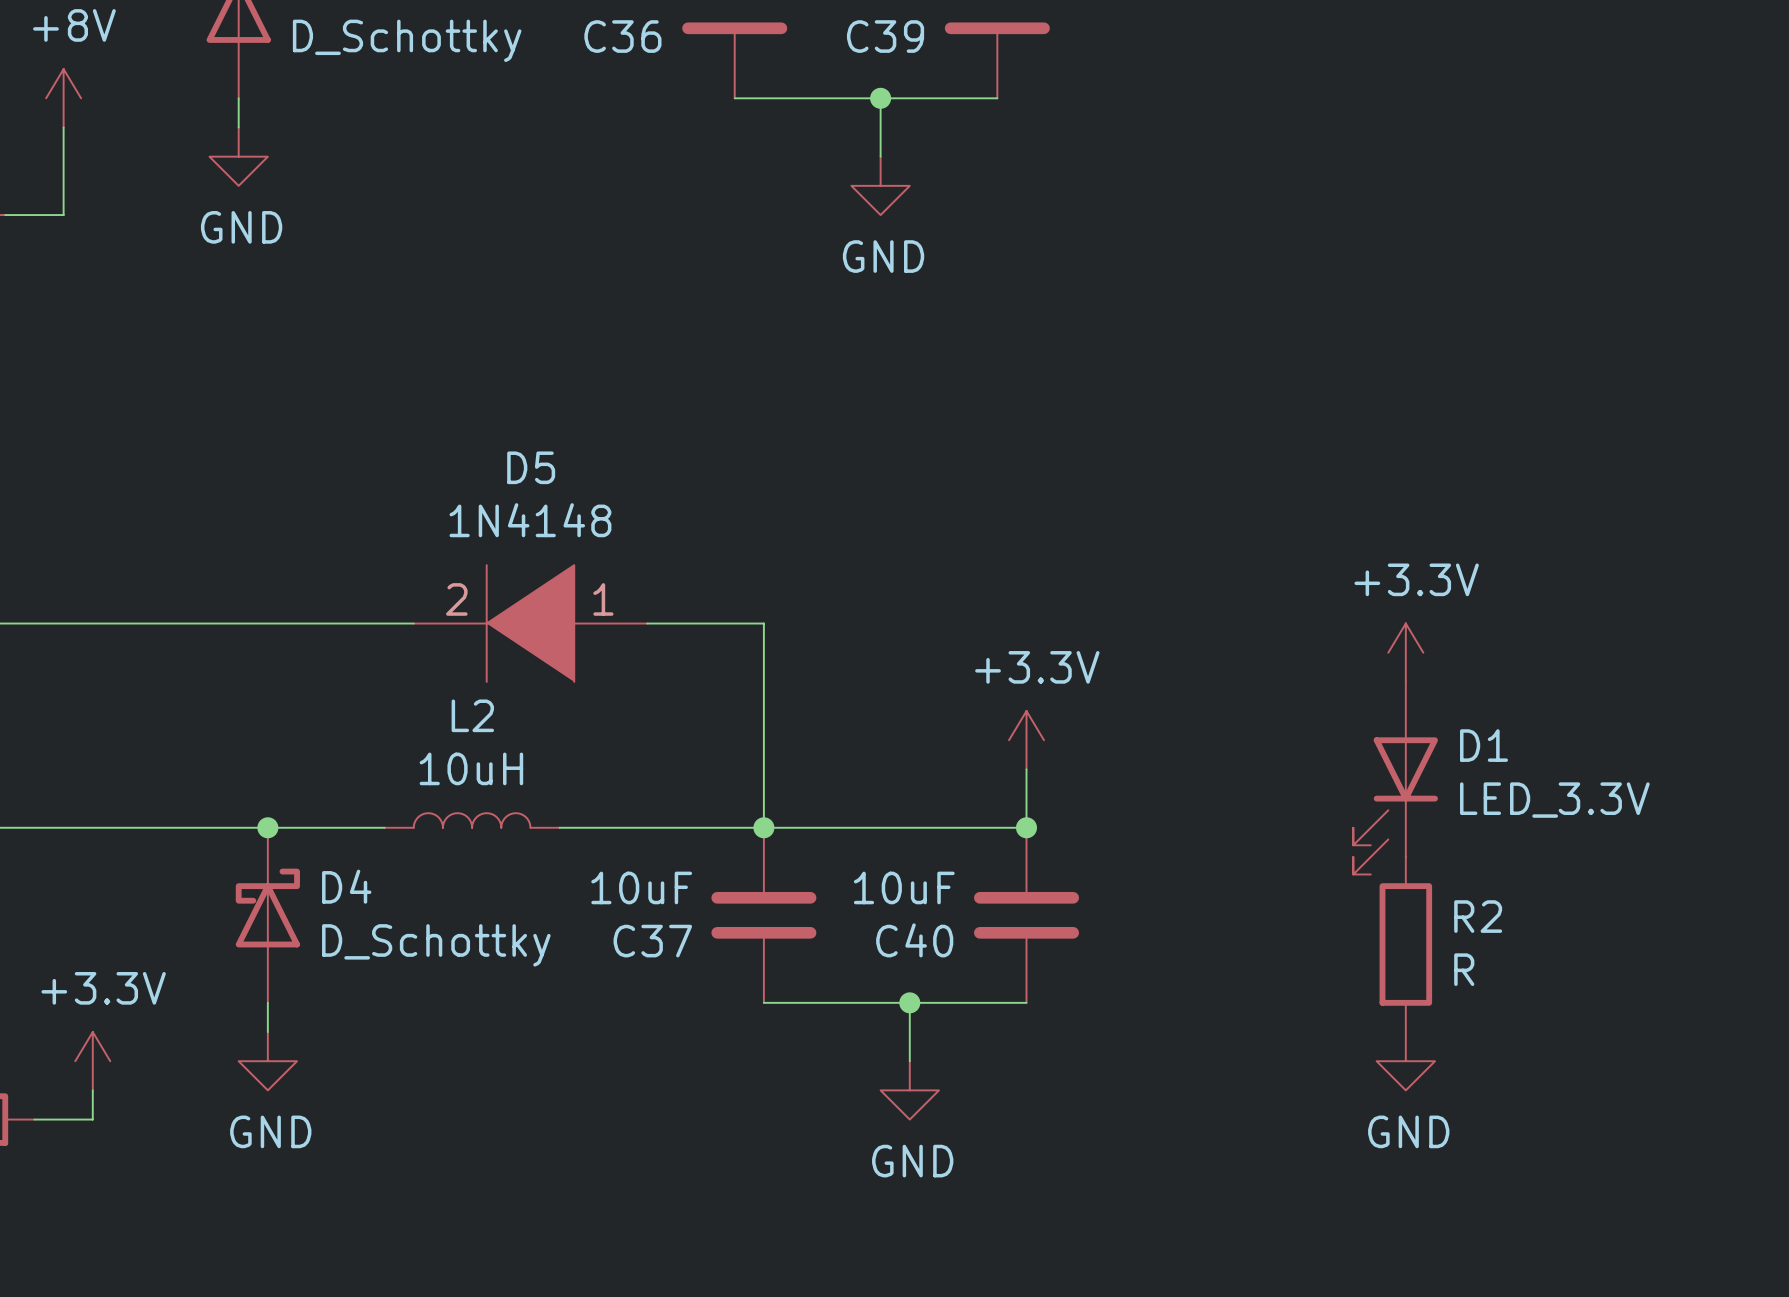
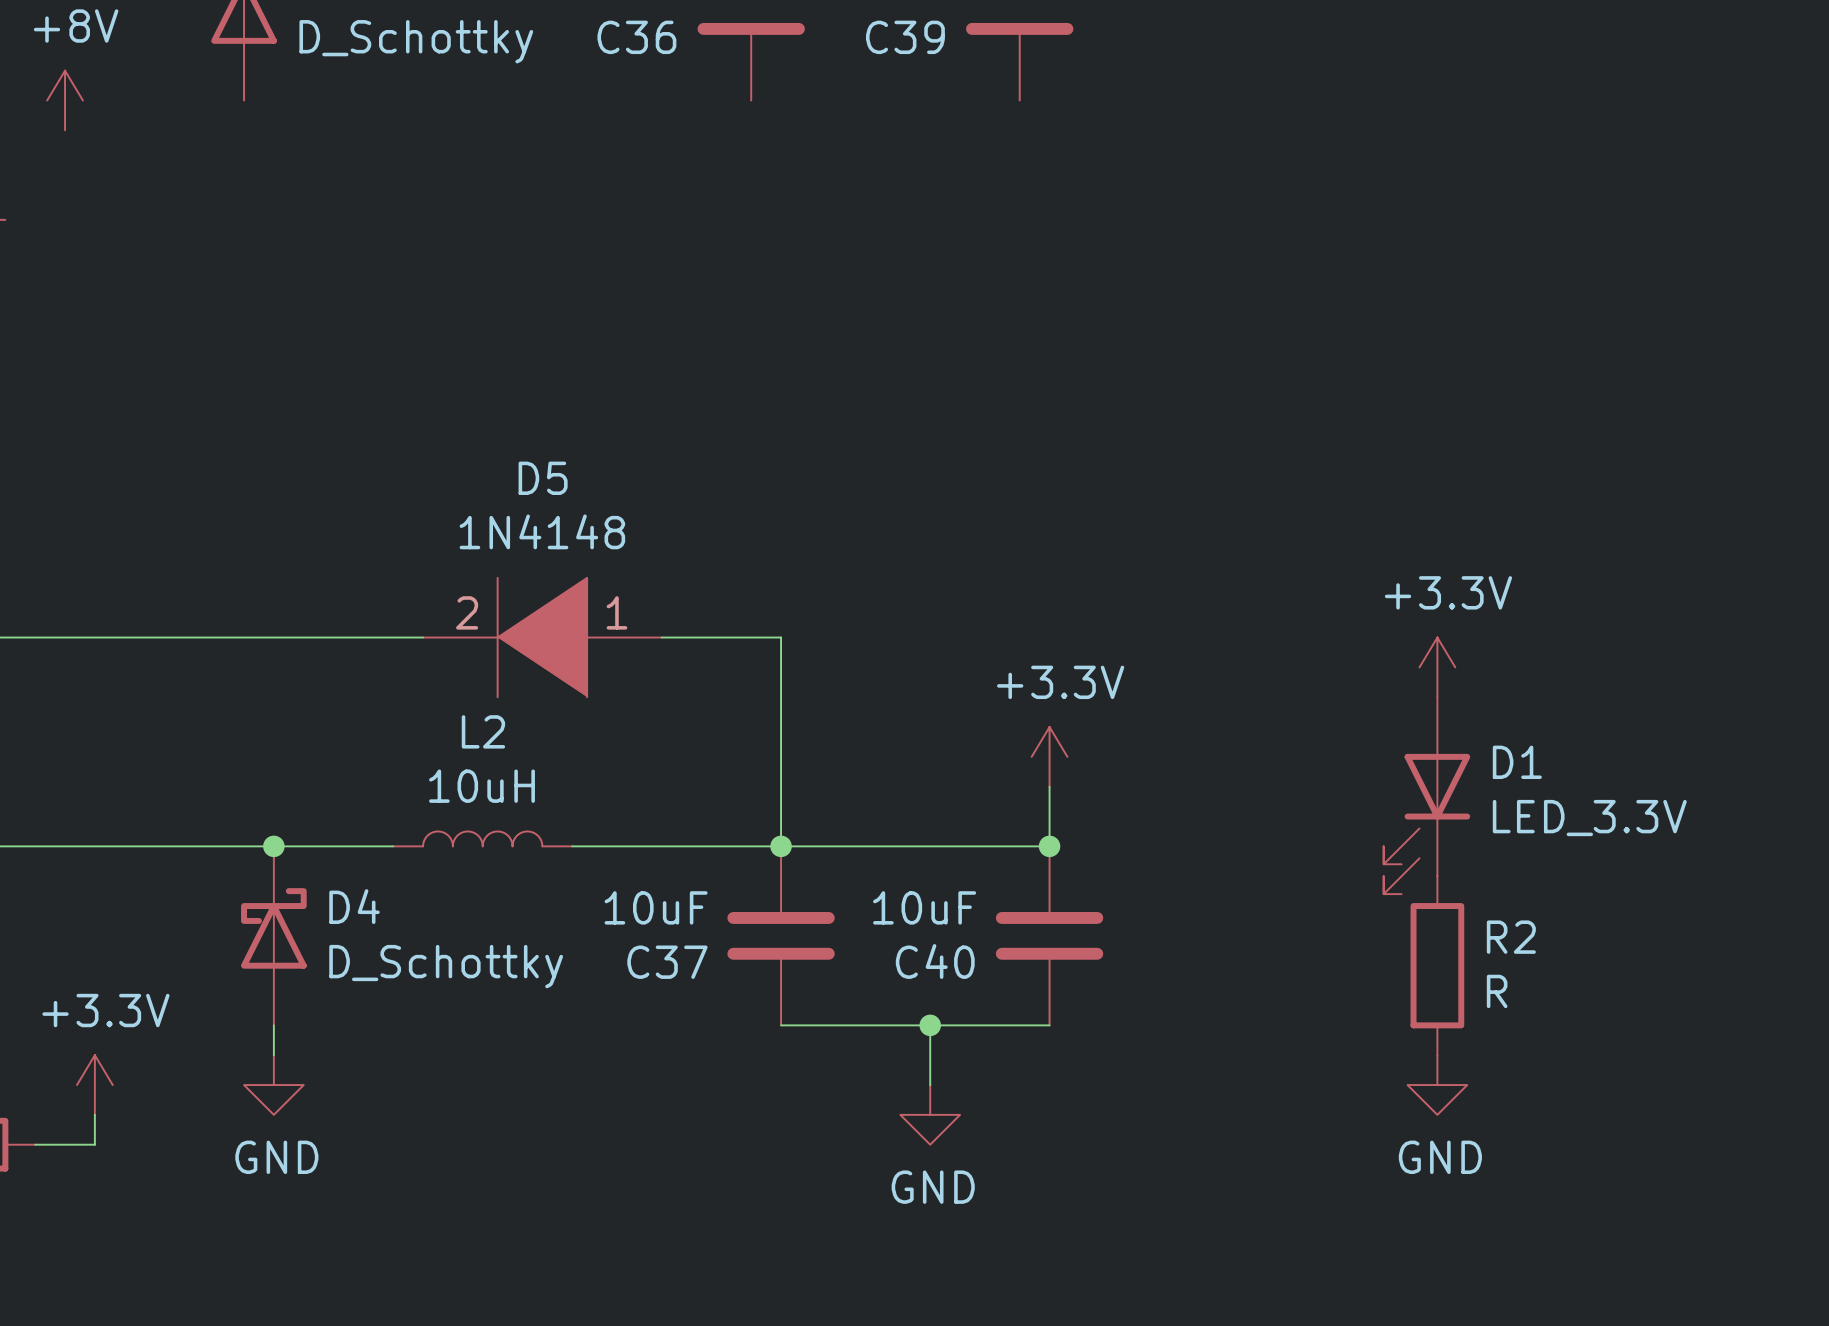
wire: (238, 98) (238, 127) -> none
wire: (734, 98) (997, 98) -> none
wire: (880, 98) (880, 156) -> none
junction: (880, 98) -> none
wire: (63, 127) (63, 215) (5, 215) -> none
power symbol: GND (238, 156) -> none
power symbol: GND (880, 185) -> none

